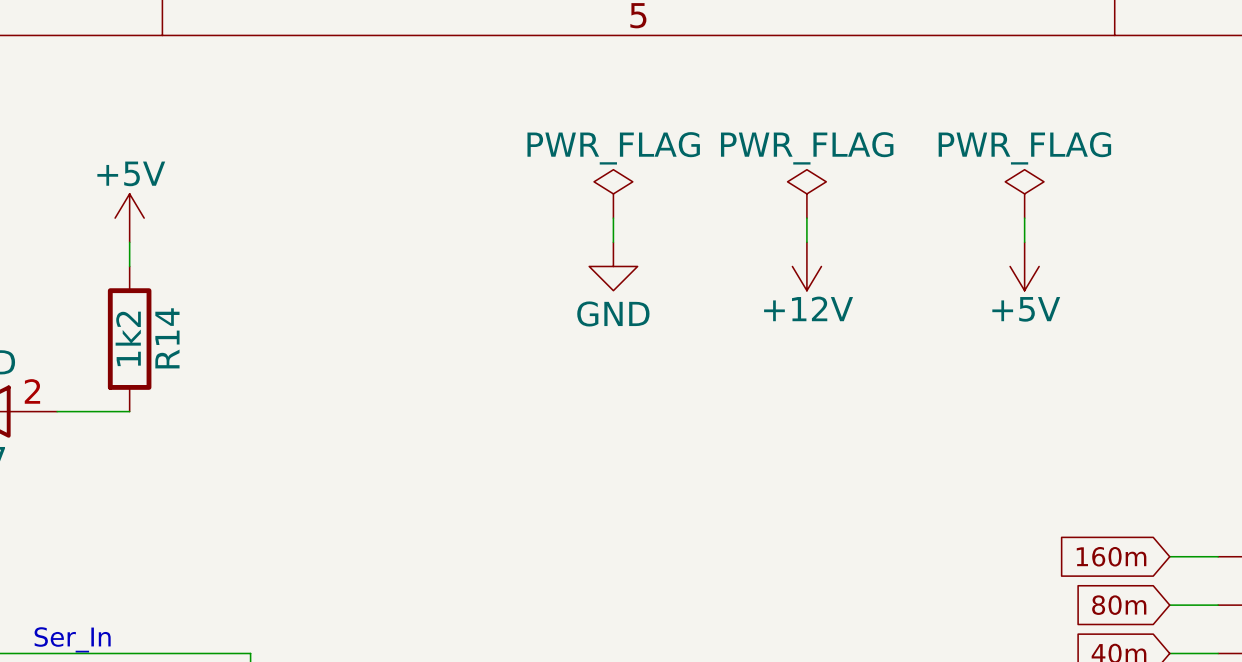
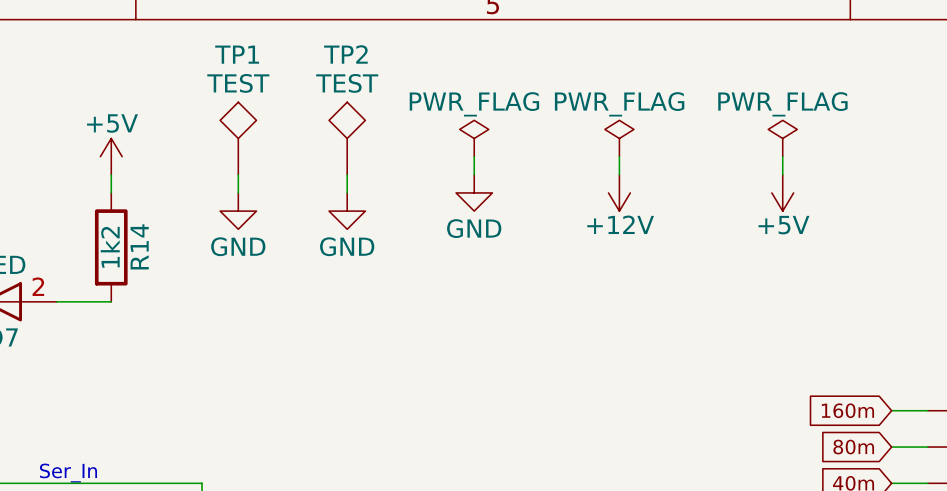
TP1: none -> TEST (238, 138)
TP2: none -> TEST (347, 138)
wire: none -> (238, 174) (238, 192)
wire: none -> (347, 174) (347, 192)
power symbol: none -> GND (238, 211)
power symbol: none -> GND (347, 211)

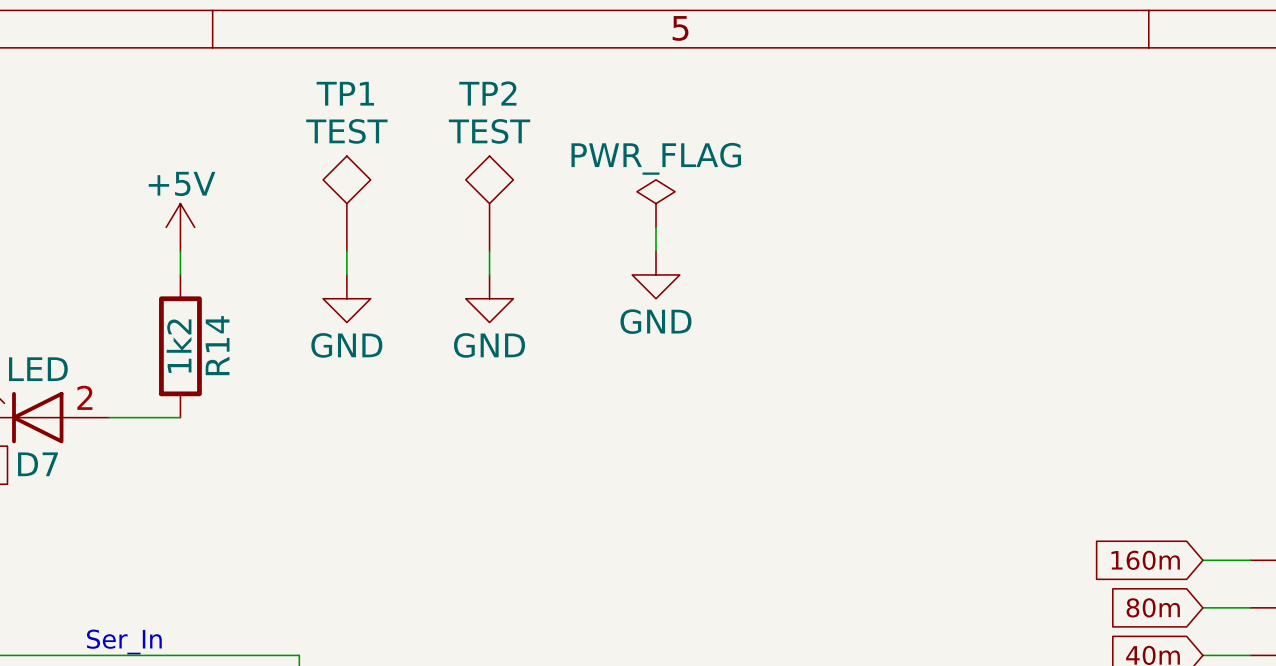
power symbol: PWR_FLAG (619, 138) -> none
power symbol: PWR_FLAG (782, 138) -> none
wire: (619, 156) (619, 174) -> none
wire: (782, 156) (782, 174) -> none
power symbol: +12V (619, 192) -> none
power symbol: +5V (782, 192) -> none

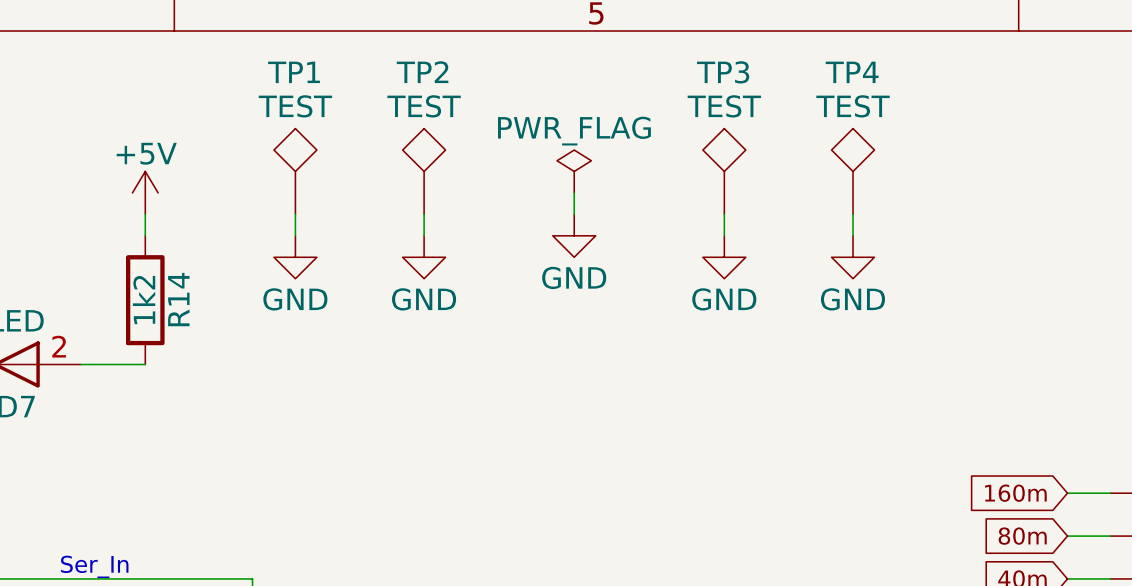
TP3: none -> TEST (724, 171)
TP4: none -> TEST (853, 171)
wire: none -> (724, 214) (724, 235)
wire: none -> (853, 214) (853, 235)
power symbol: none -> GND (724, 257)
power symbol: none -> GND (853, 257)

